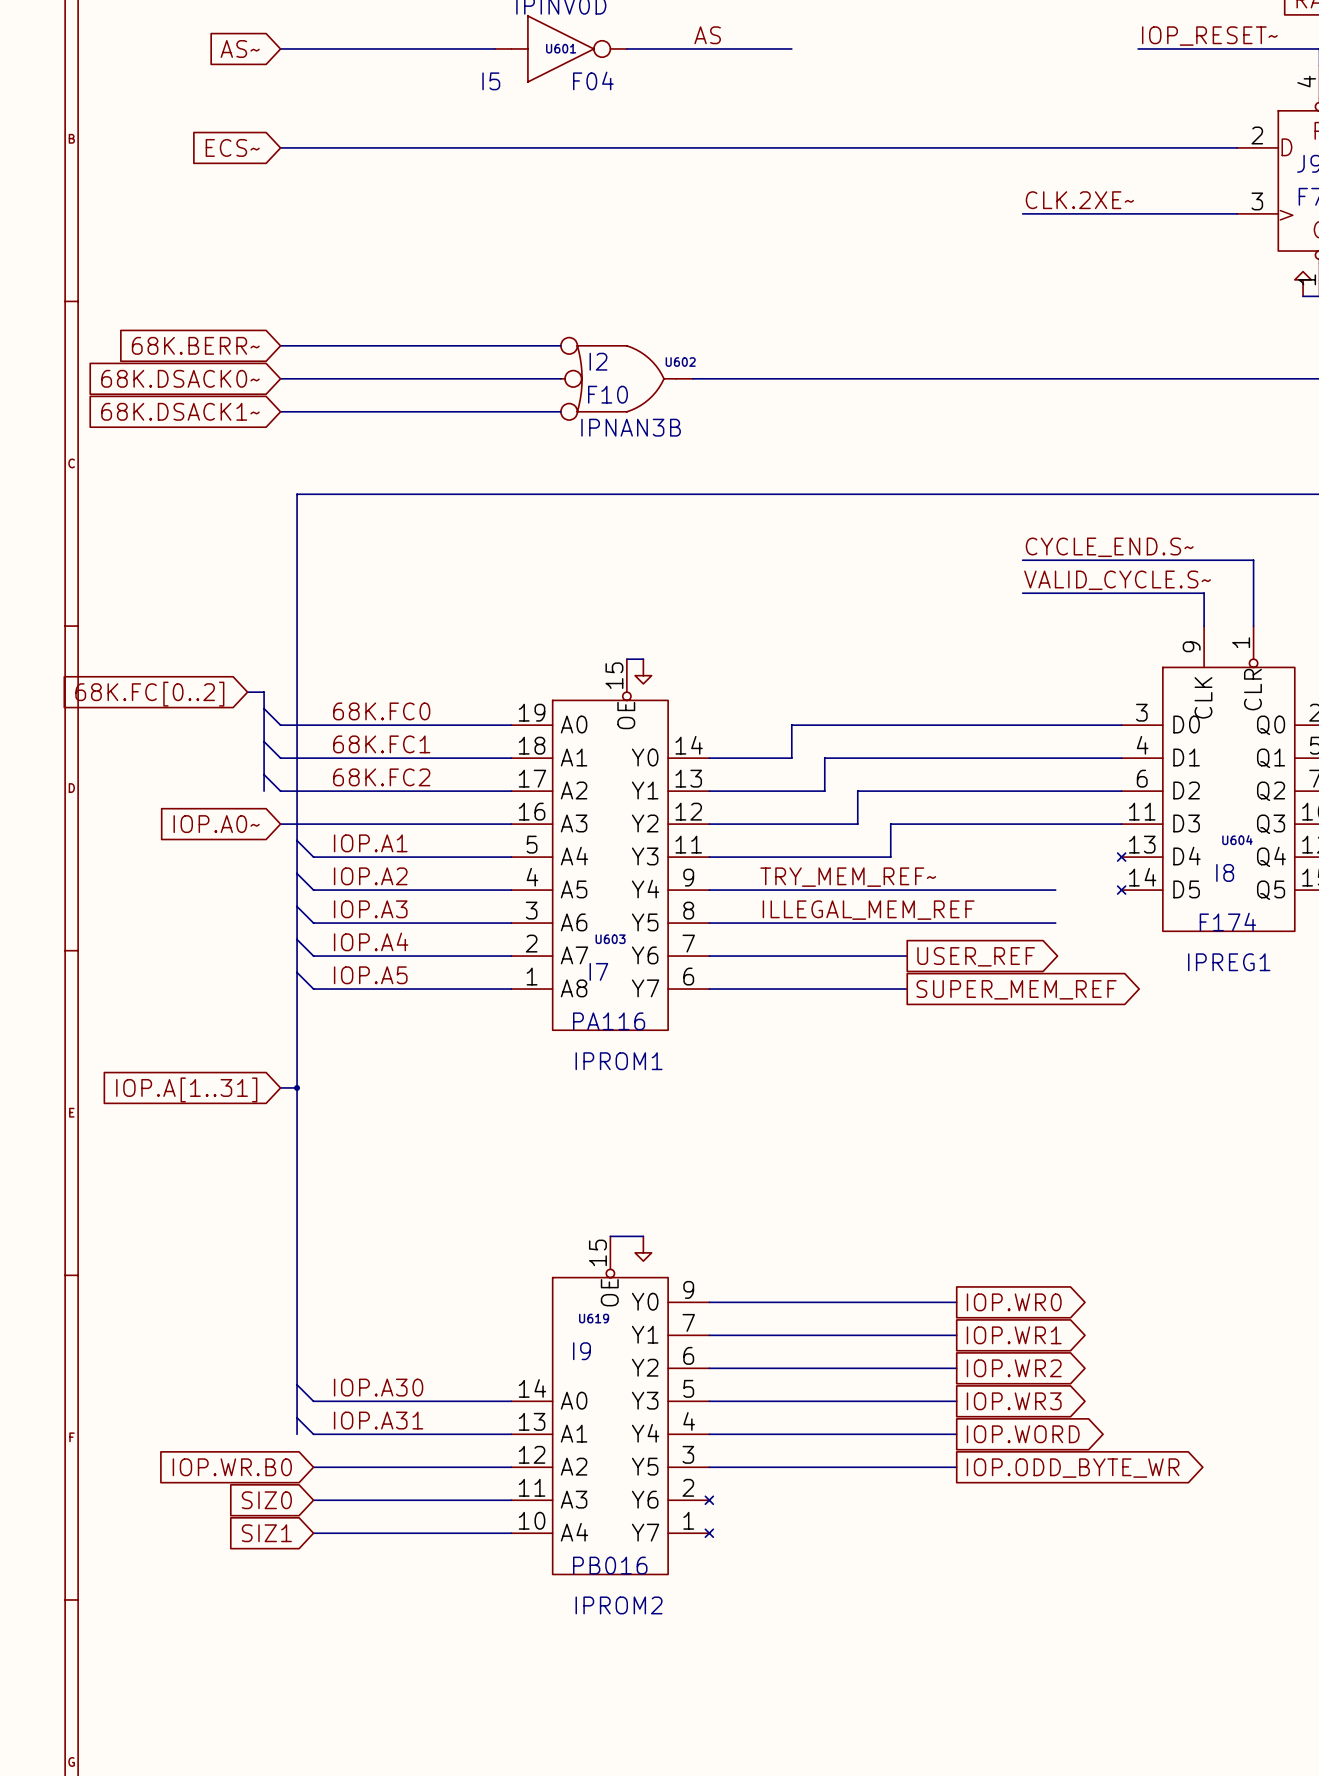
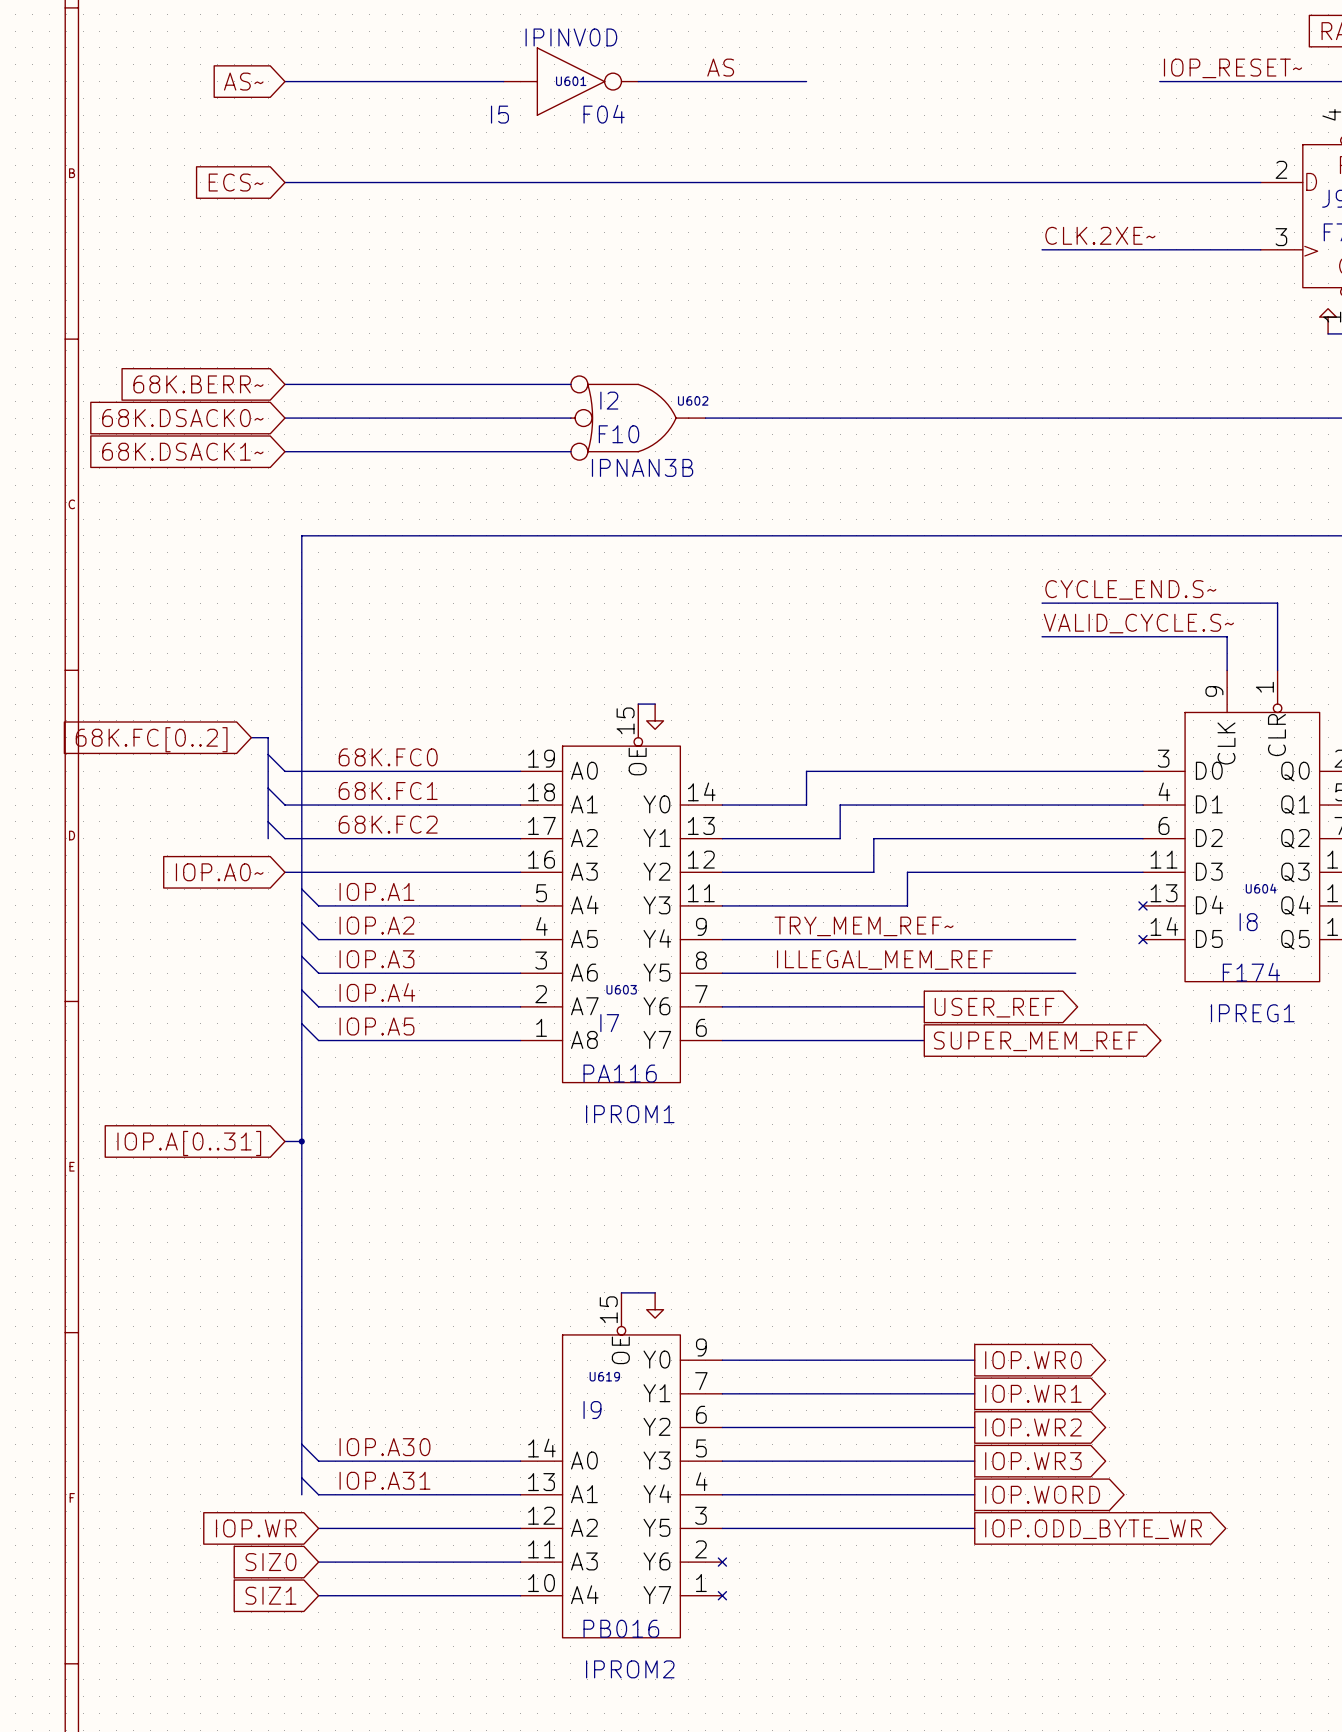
global label: IOP.A[1..31] (186, 1089) -> IOP.A[0..31] (189, 1143)
global label: IOP.WR.B0 (232, 1467) -> IOP.WR (256, 1528)

